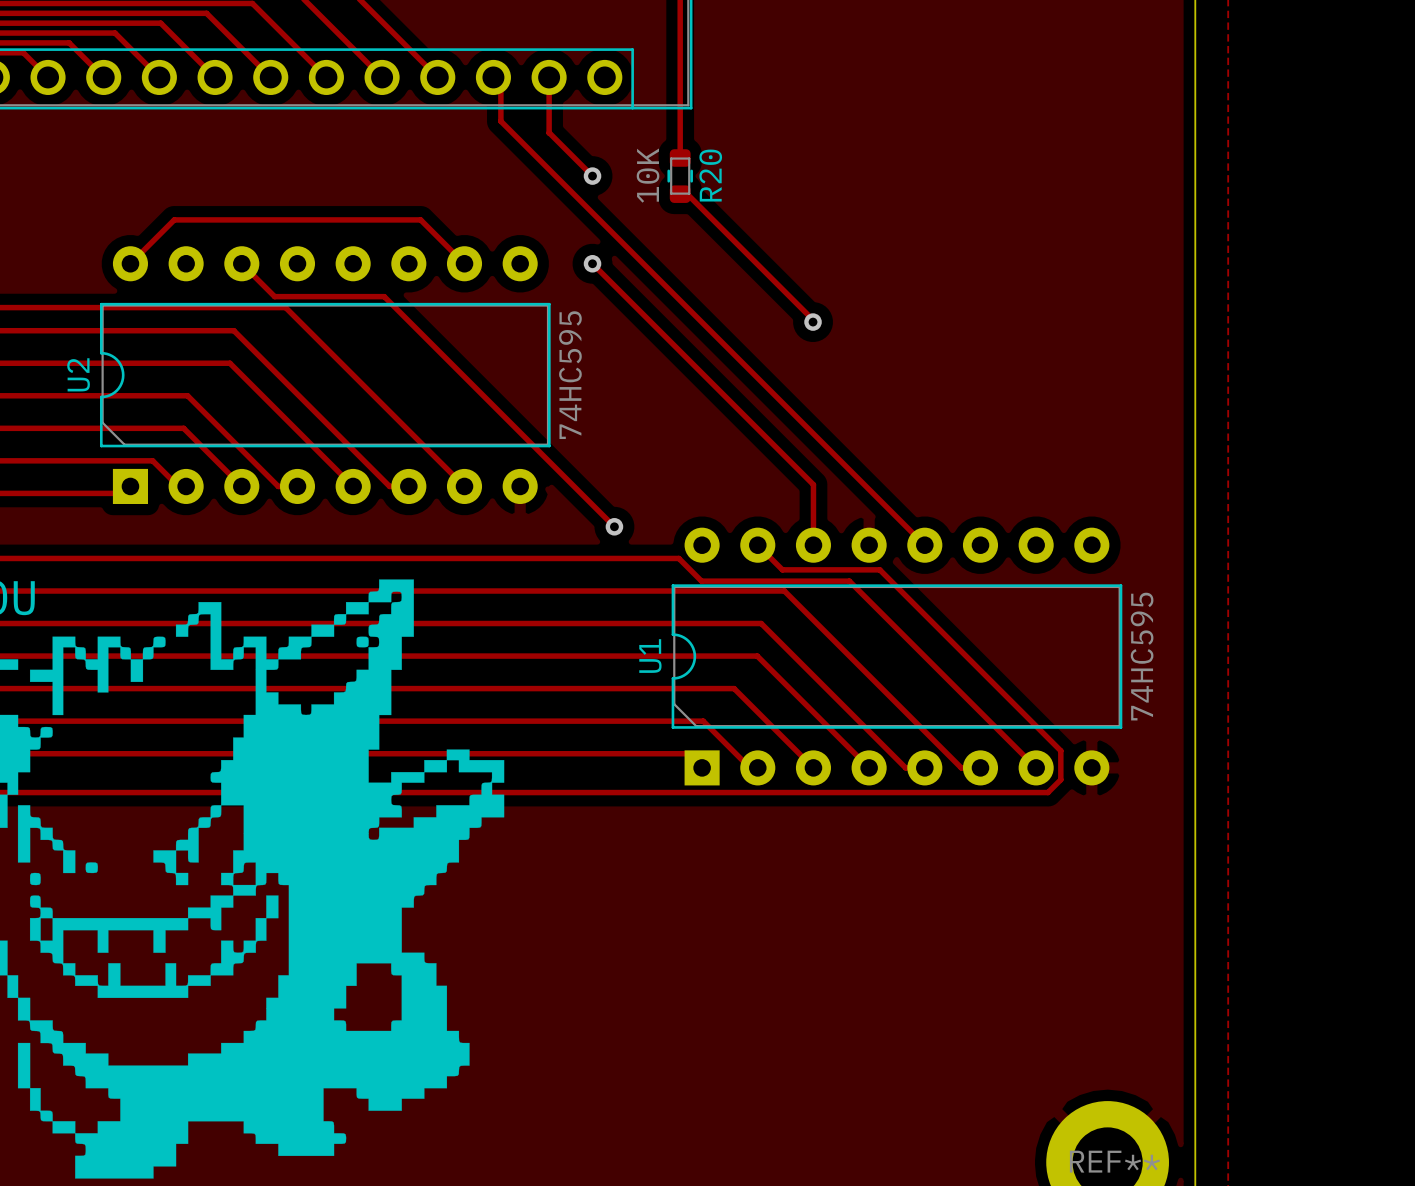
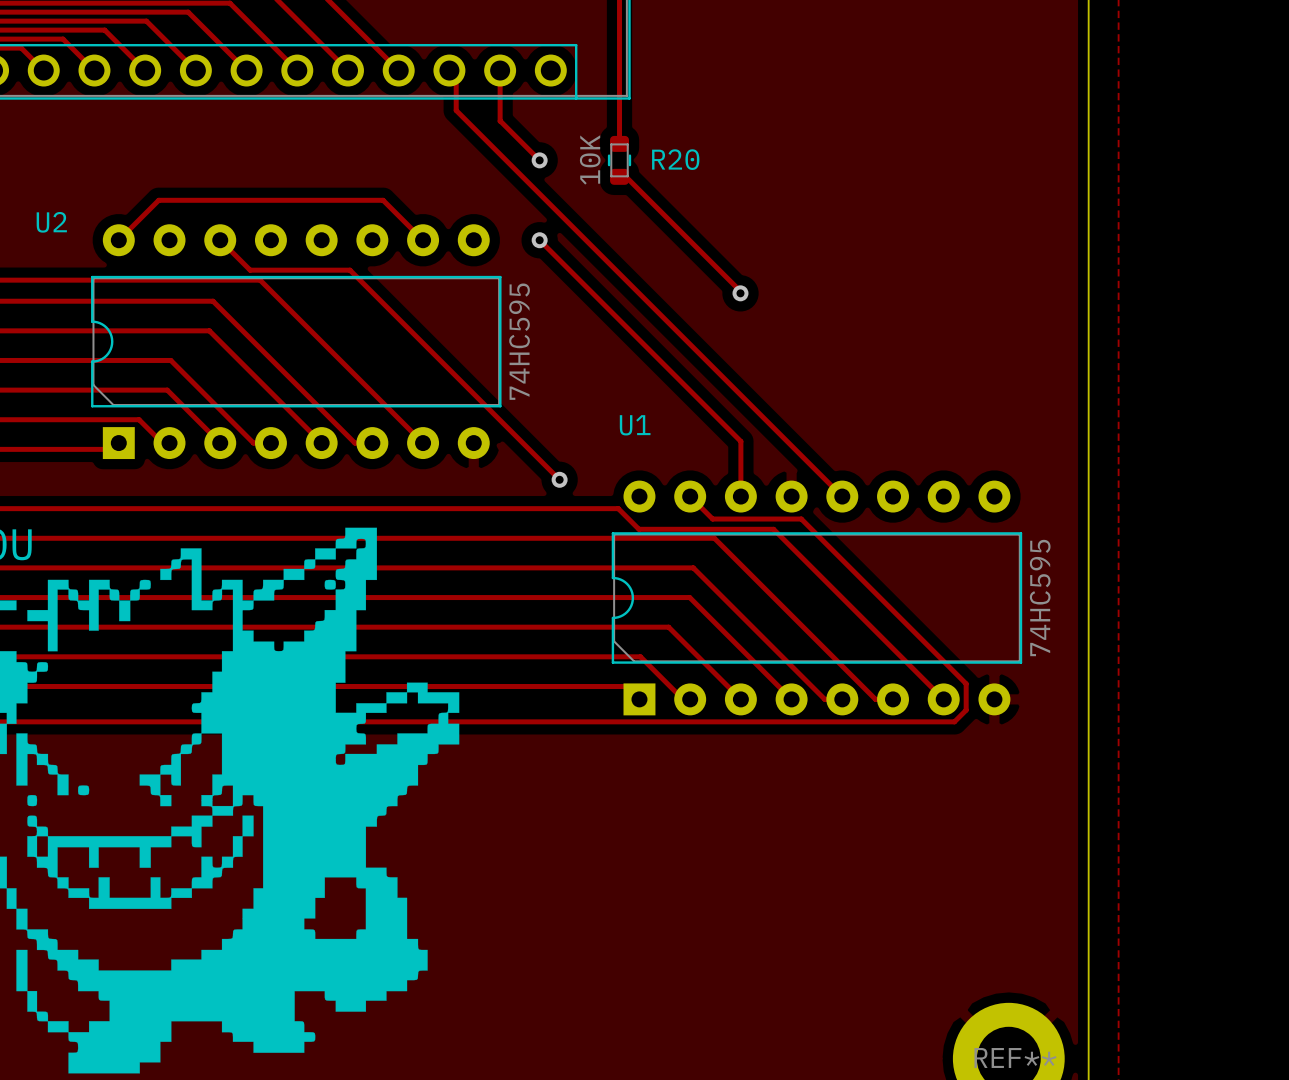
R20 name rotation: 0° (710, 175) -> 90° clockwise (675, 159)
U2 name rotation: 0° (78, 374) -> 90° clockwise (51, 222)
U2 name position: U2 (78, 374) -> U2 (51, 222)
U1 name rotation: 0° (650, 656) -> 90° clockwise (635, 425)
U1 name position: U1 (650, 656) -> U1 (635, 425)

